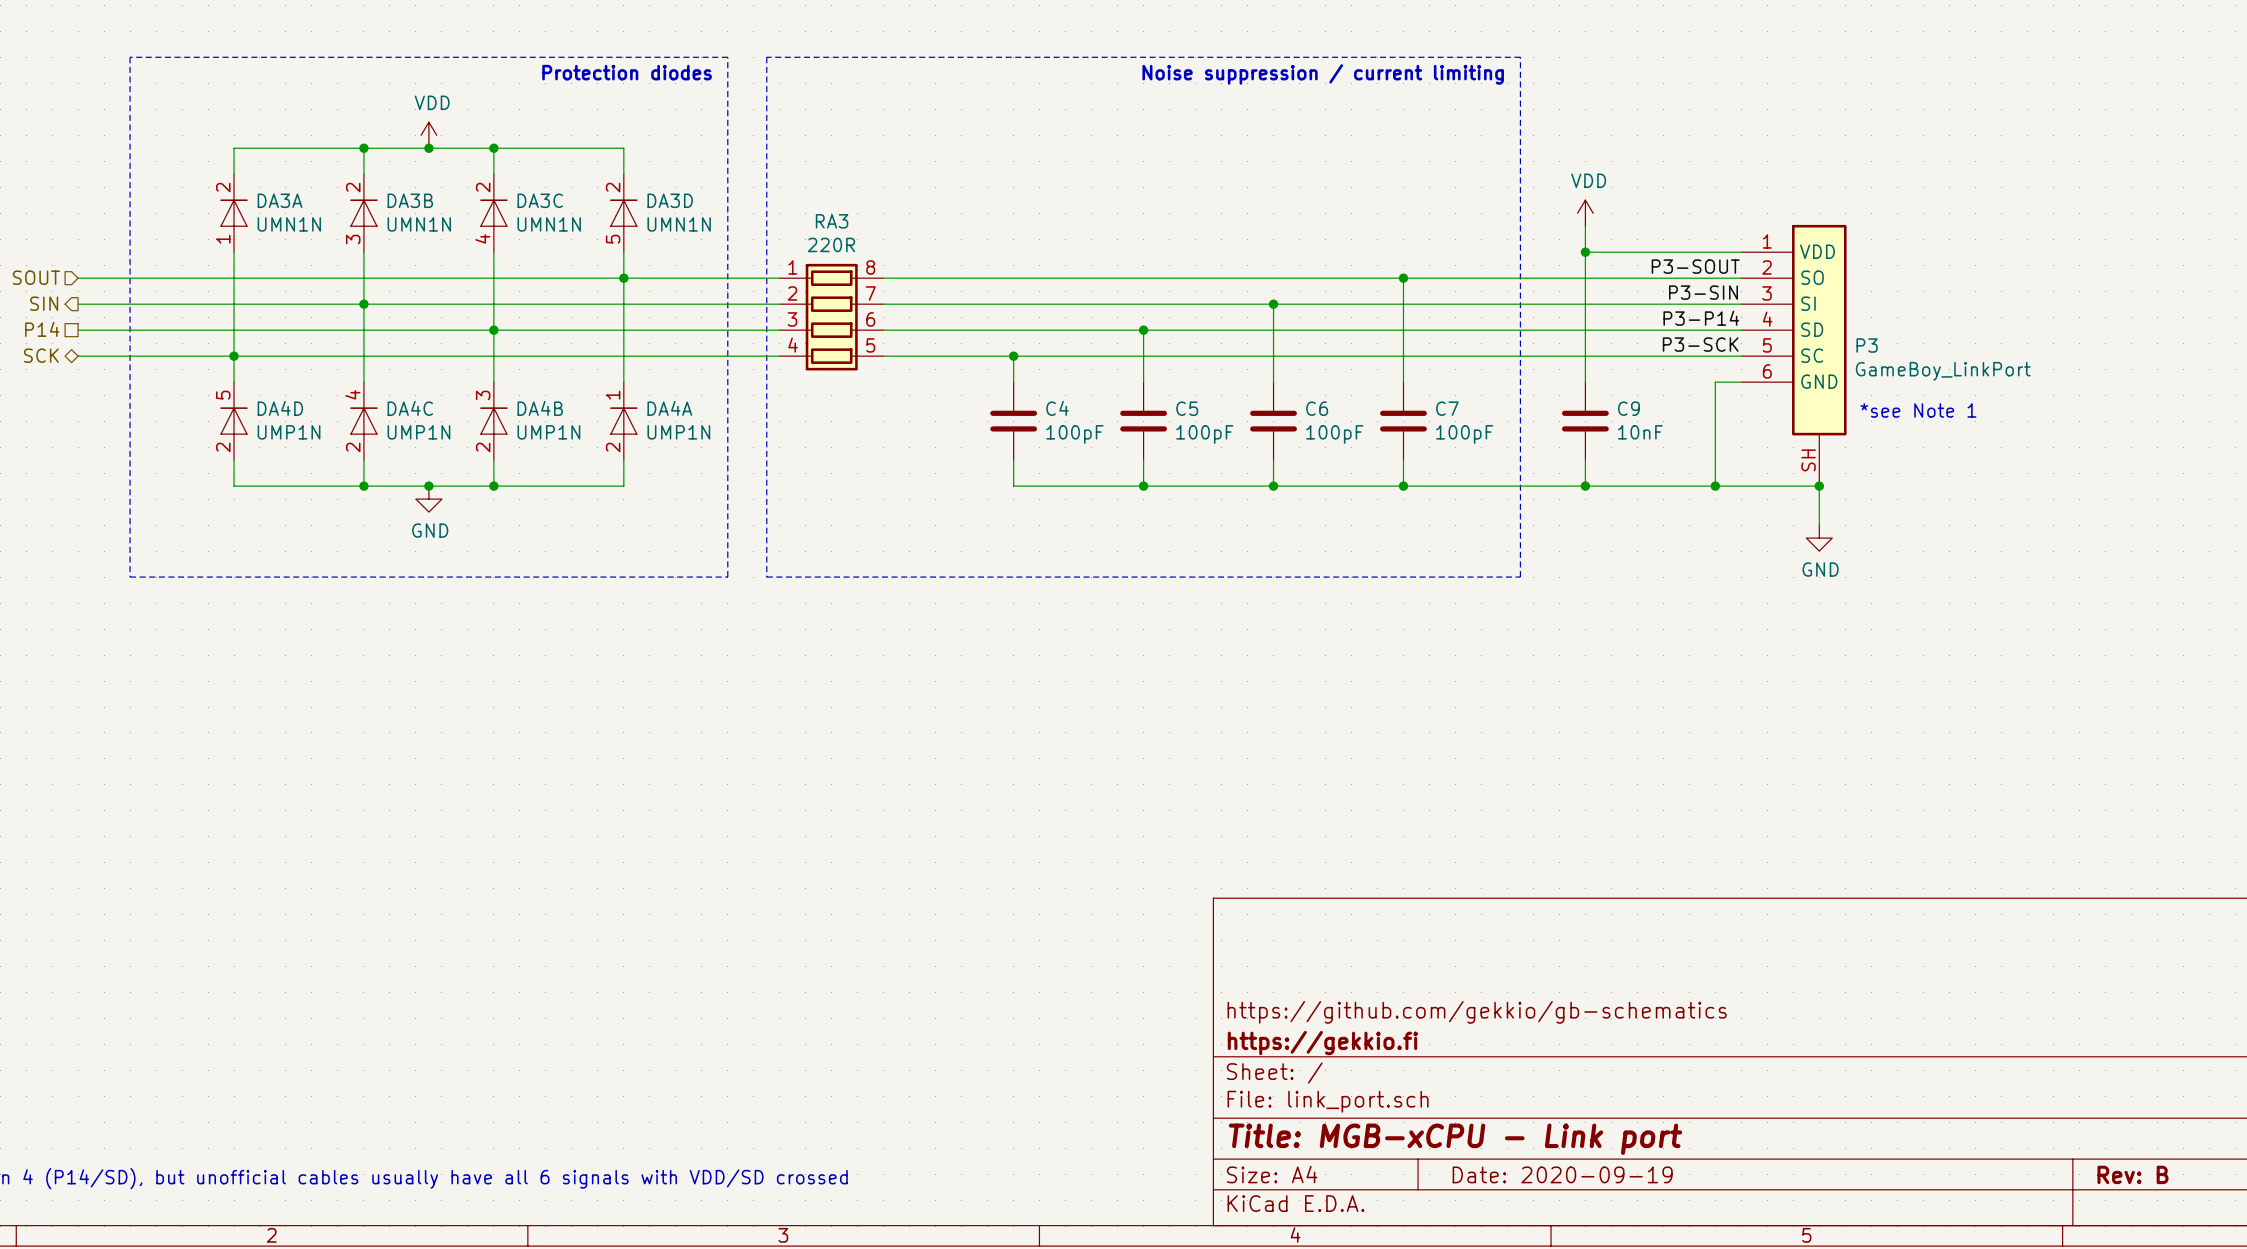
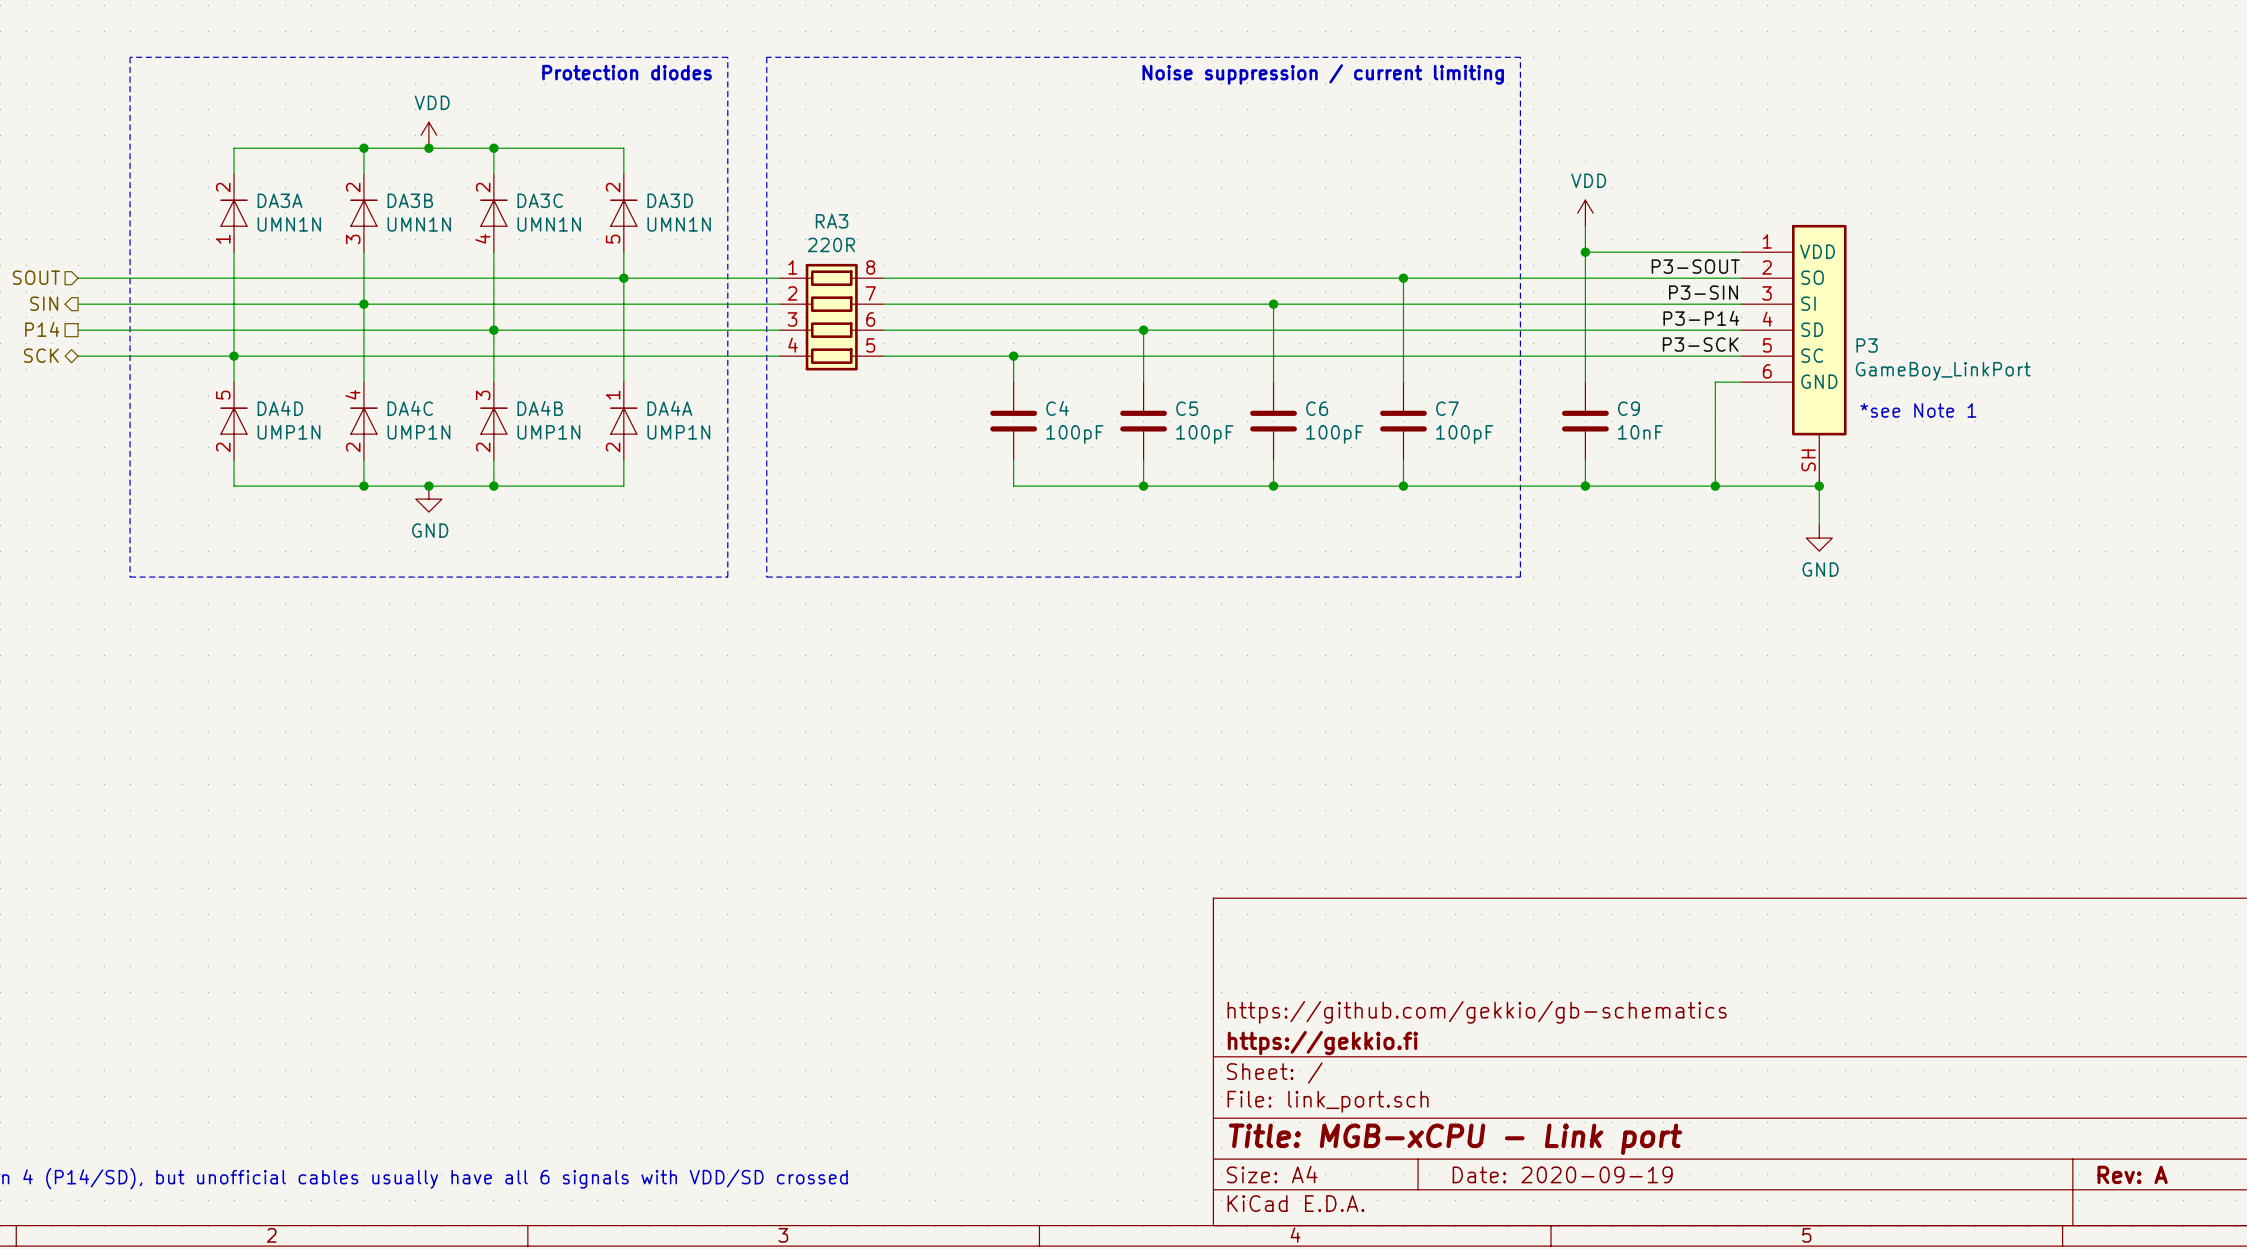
title block: Rev: B (2132, 1174) -> Rev: A (2132, 1174)

